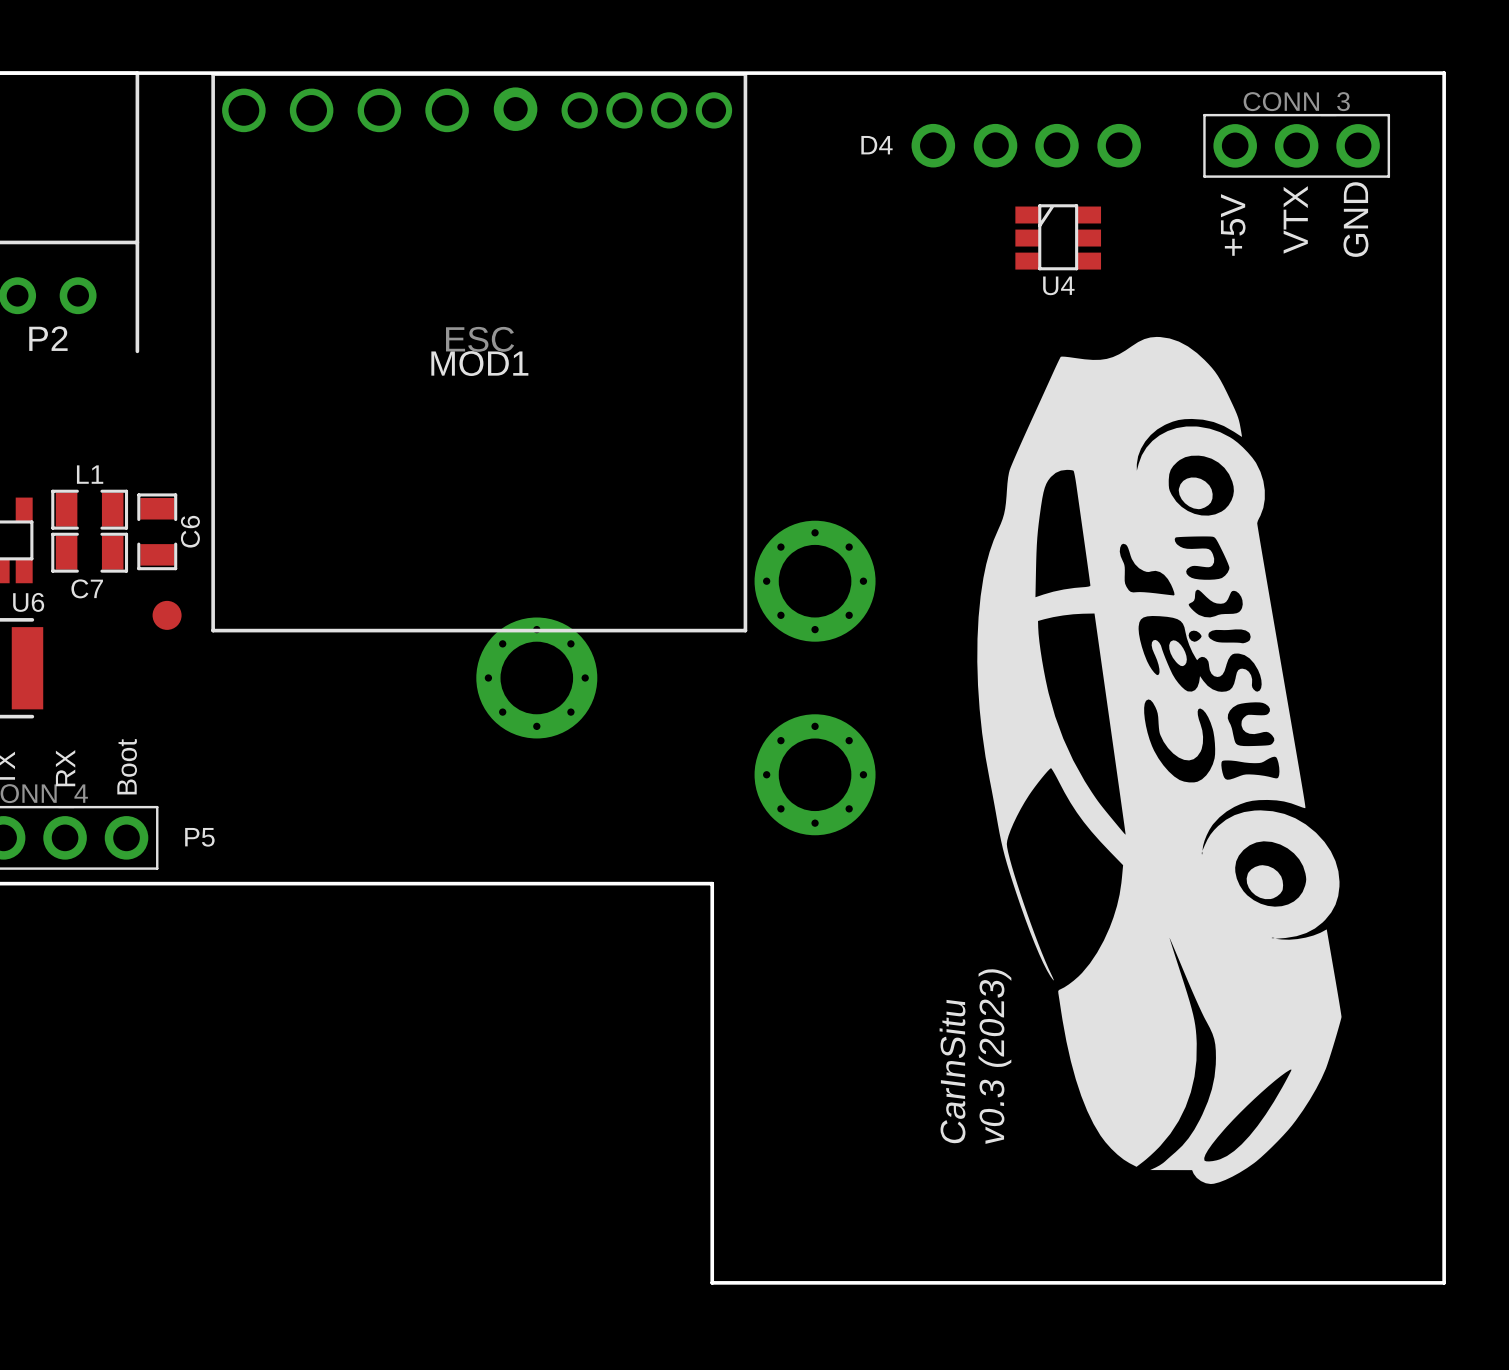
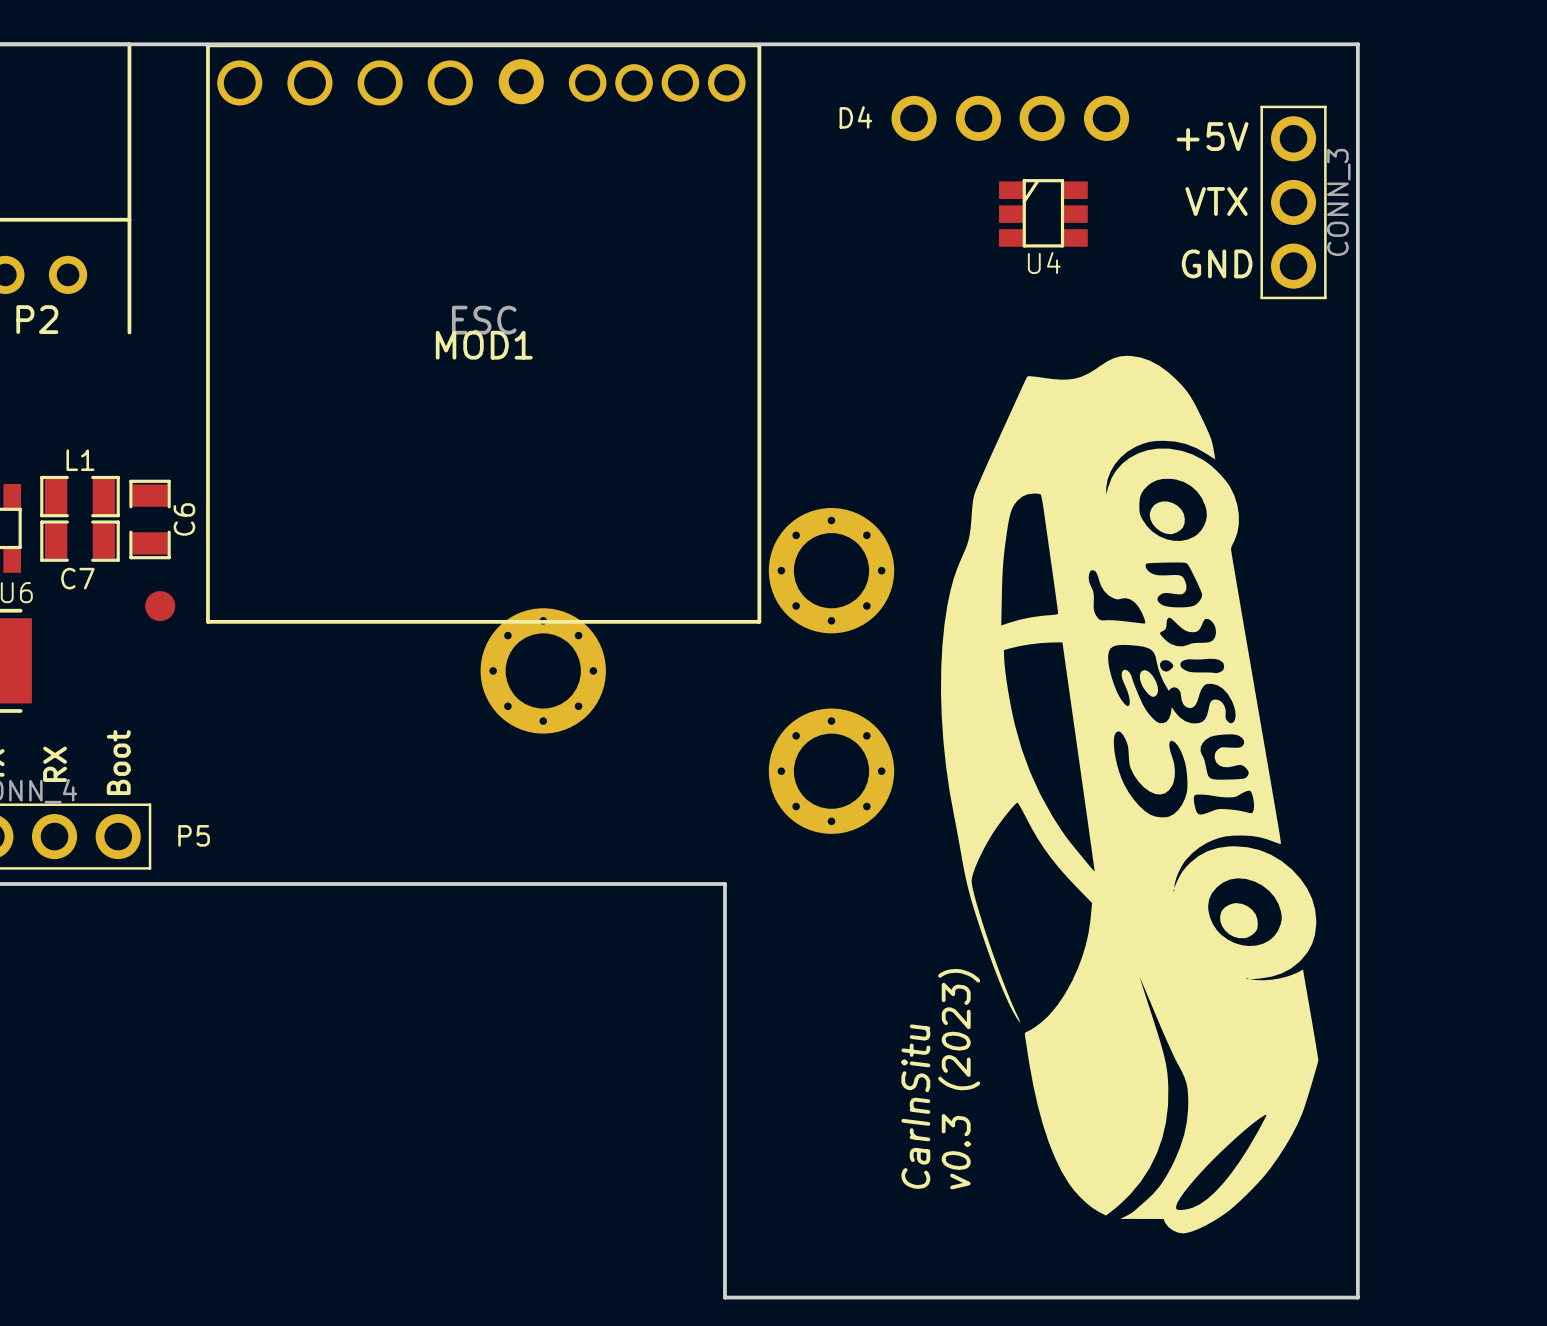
board edge: (1323, 73) (1444, 73) (1444, 1282) (1323, 1282) -> (1357, 44) (1357, 1297)
D4 position: (1026, 145) -> (1010, 118)
part rotation: 0° (1296, 145) -> 90° clockwise (1293, 202)
text rotation: 0° (1295, 219) -> 90° clockwise (1216, 201)
text position: VTX (1295, 219) -> VTX (1216, 201)
text rotation: 0° (1355, 219) -> 90° clockwise (1217, 263)
text position: GND (1355, 219) -> GND (1217, 263)
text rotation: 0° (1233, 224) -> 90° clockwise (1212, 136)
U4 position: (1058, 237) -> (1043, 213)
drawing position: (1159, 760) -> (1129, 794)
text position: v0.3 (2023) (994, 1056) -> v0.3 (2023) (959, 1079)
text position: CarInSitu (952, 1071) -> CarInSitu (915, 1106)

